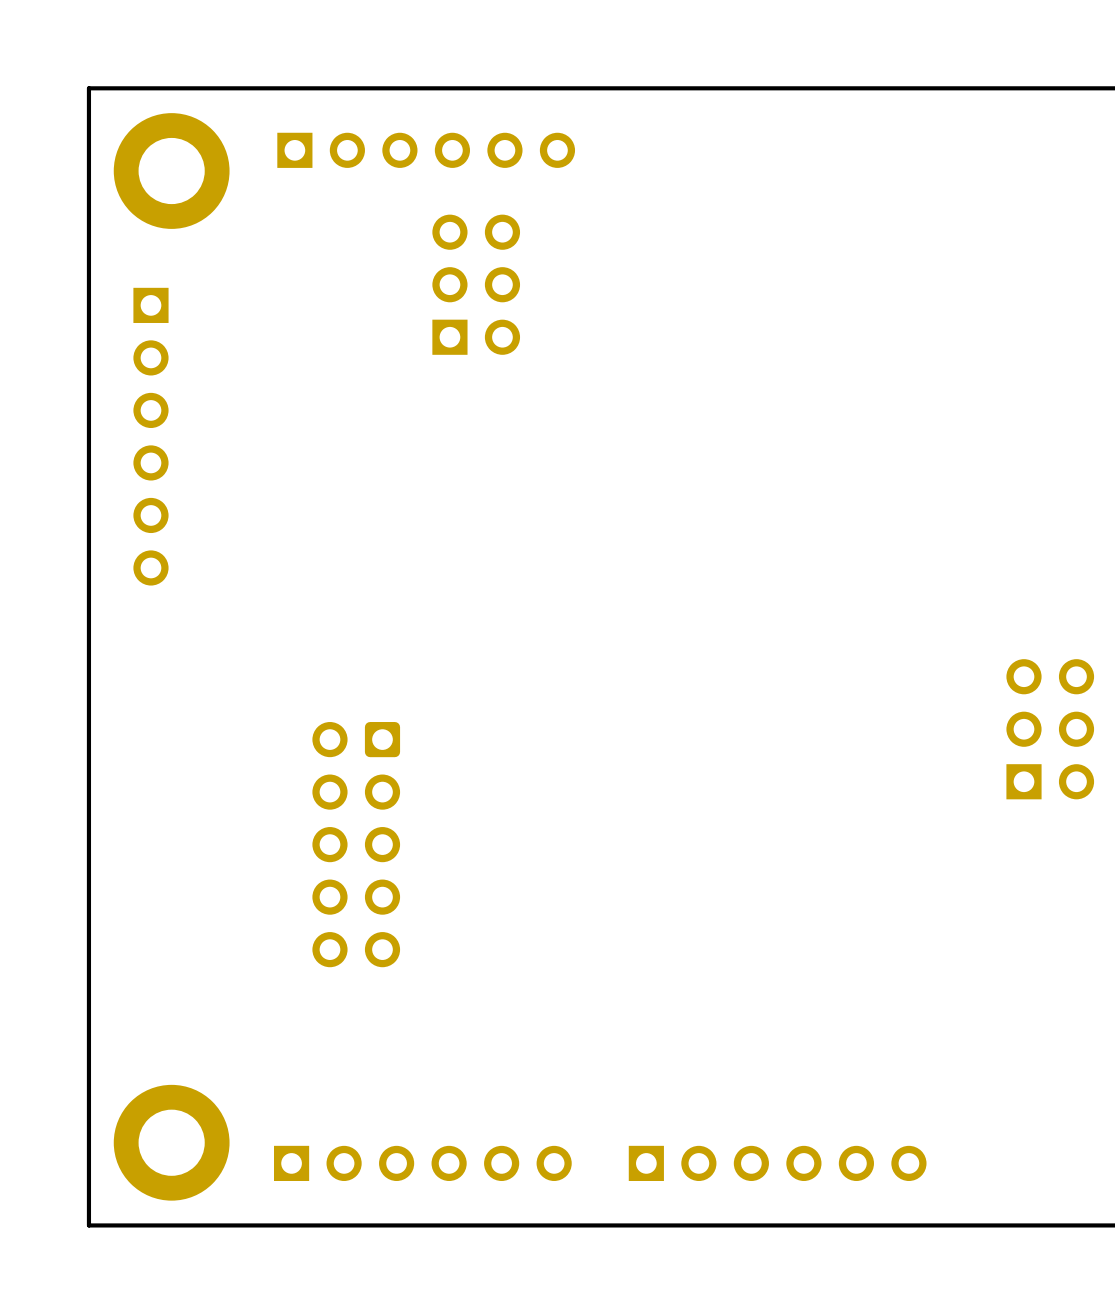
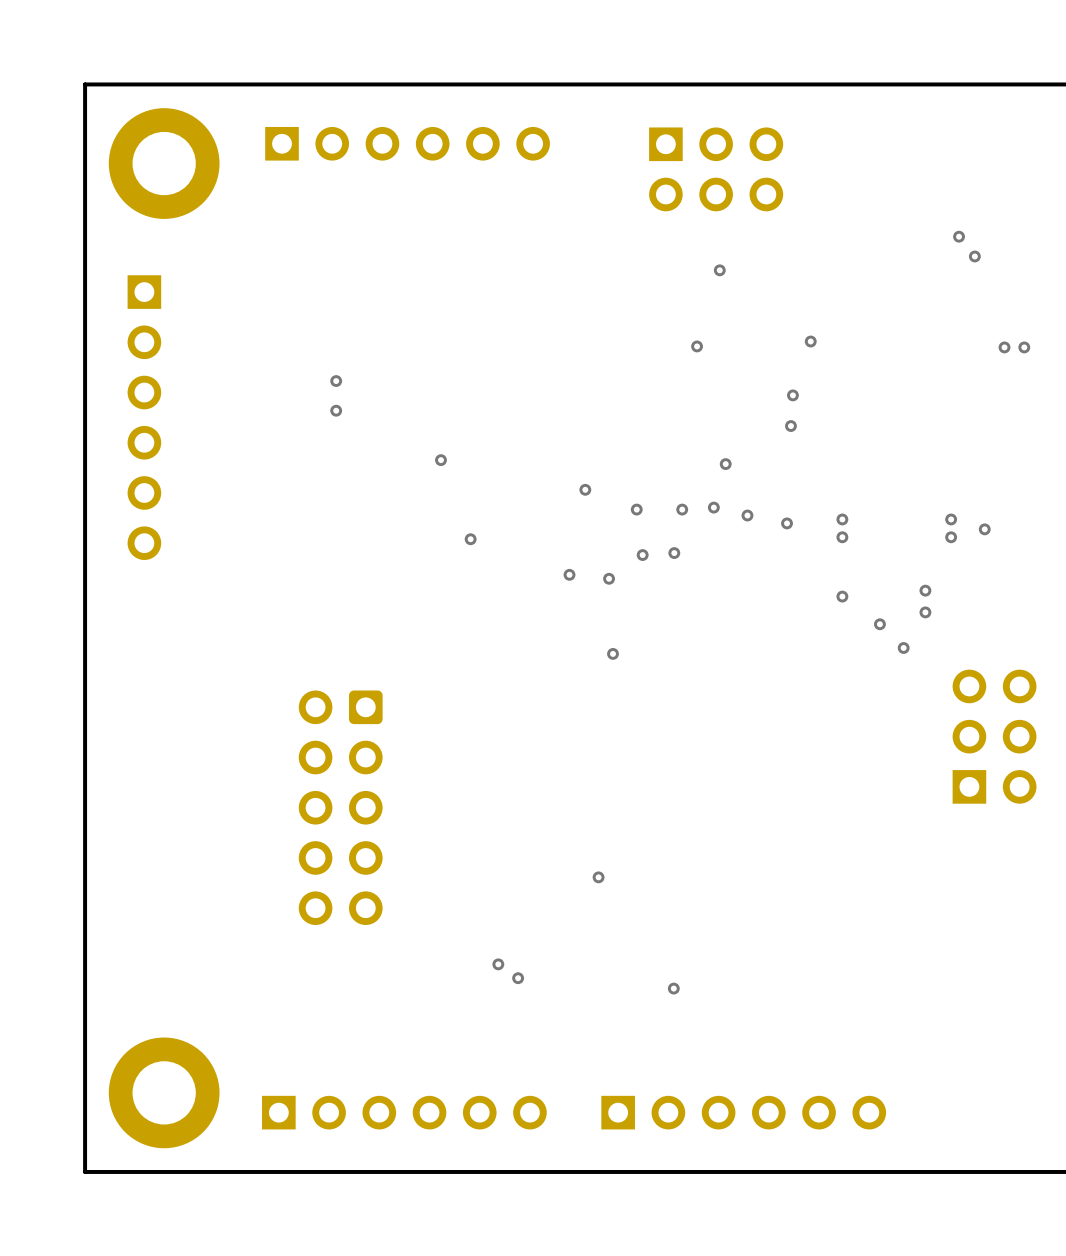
via: none -> (959, 236)
via: none -> (974, 256)
via: none -> (719, 270)
part rotation: 0° (476, 284) -> 90° clockwise (716, 169)
part position: (476, 284) -> (716, 169)
via: none -> (810, 341)
via: none -> (697, 346)
via: none -> (1004, 347)
via: none -> (1024, 347)
via: none -> (336, 381)
via: none -> (792, 395)
via: none -> (336, 410)
via: none -> (790, 426)
via: none -> (440, 460)
via: none -> (725, 464)
via: none -> (585, 489)
via: none -> (713, 507)
via: none -> (636, 509)
via: none -> (682, 509)
via: none -> (747, 515)
via: none -> (842, 519)
via: none -> (951, 519)
via: none -> (787, 523)
via: none -> (984, 529)
via: none -> (842, 537)
via: none -> (951, 537)
via: none -> (470, 539)
via: none -> (674, 553)
via: none -> (642, 555)
via: none -> (569, 574)
via: none -> (609, 578)
via: none -> (925, 590)
via: none -> (842, 596)
via: none -> (925, 612)
via: none -> (879, 624)
via: none -> (903, 647)
via: none -> (613, 653)
part position: (1050, 729) -> (994, 736)
via: none -> (598, 877)
via: none -> (498, 964)
via: none -> (518, 978)
via: none -> (673, 988)

